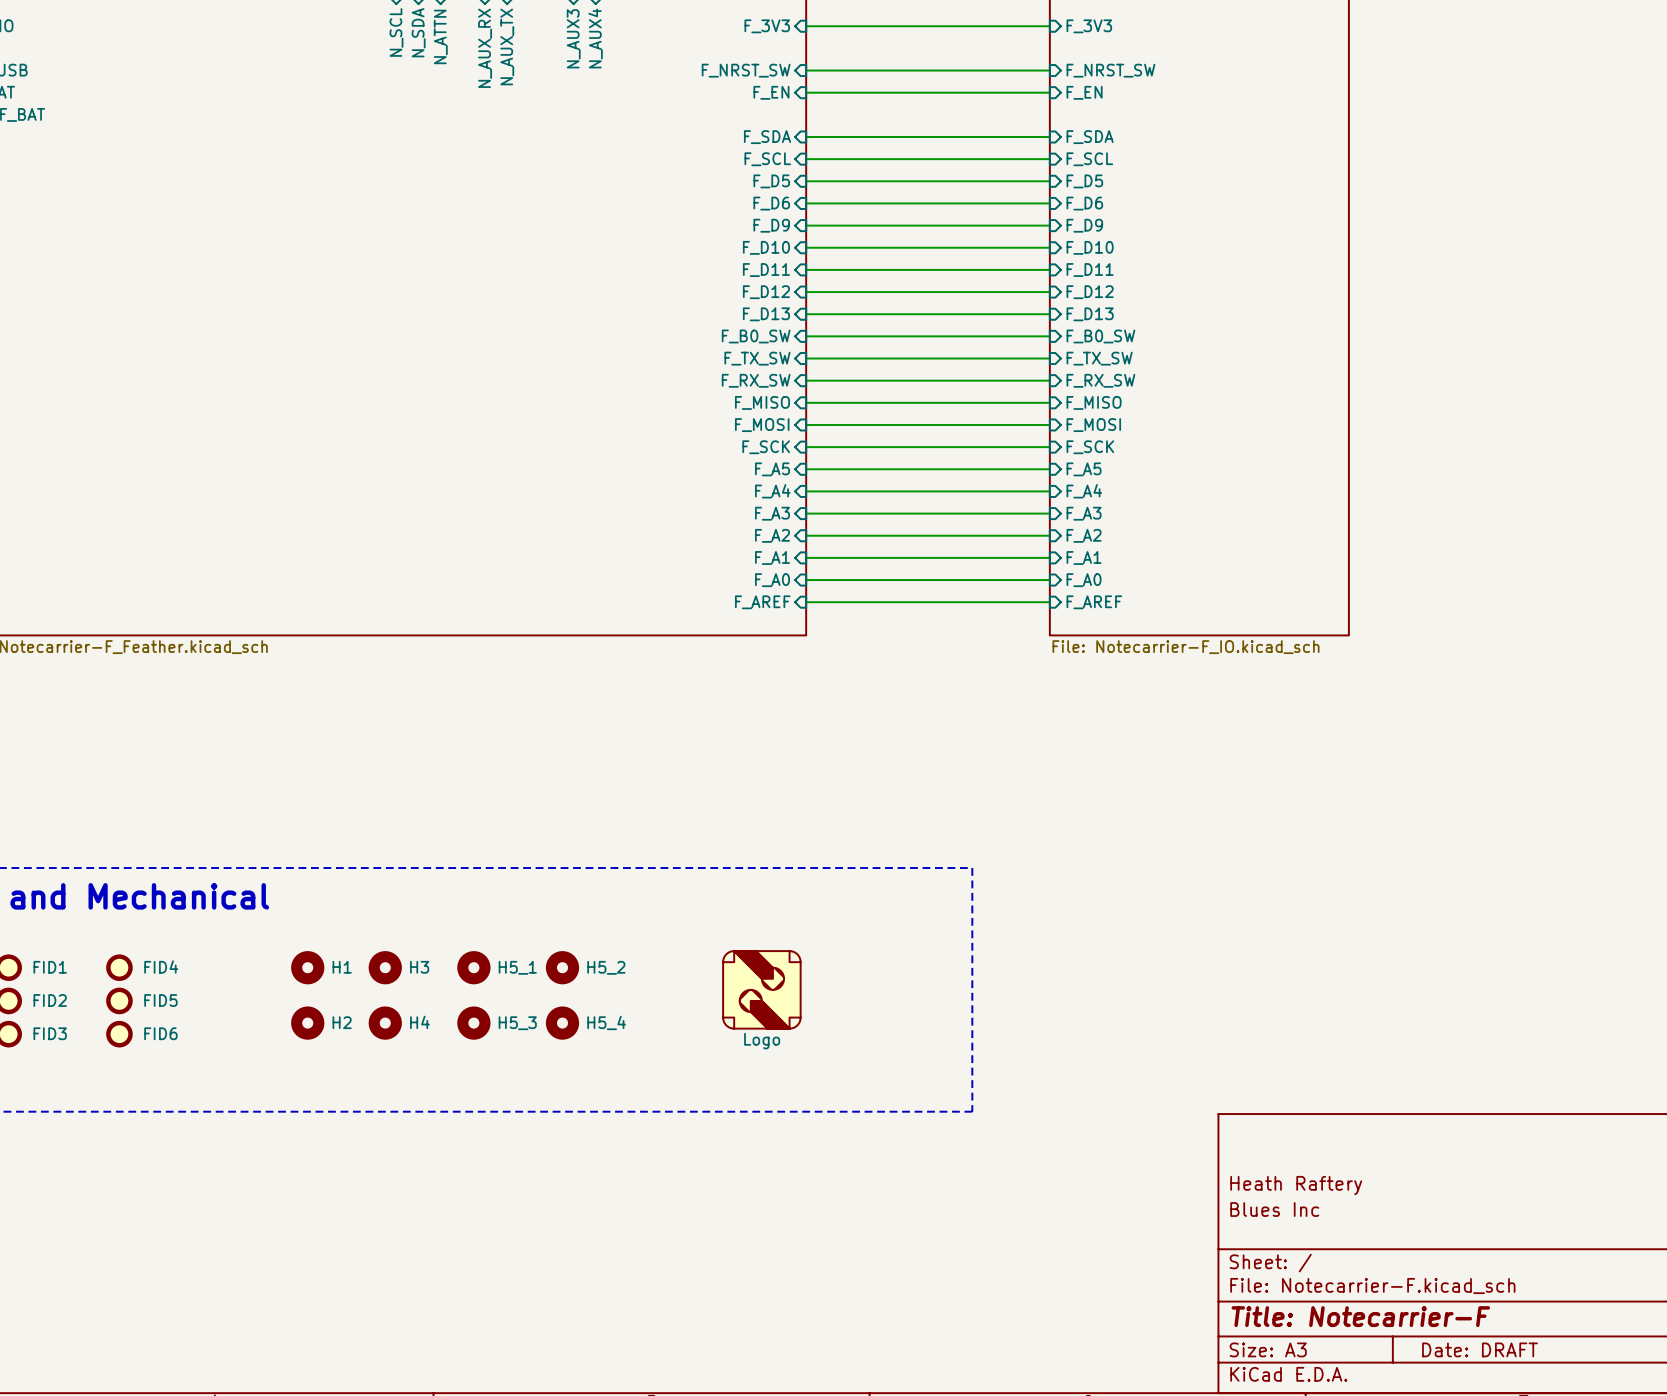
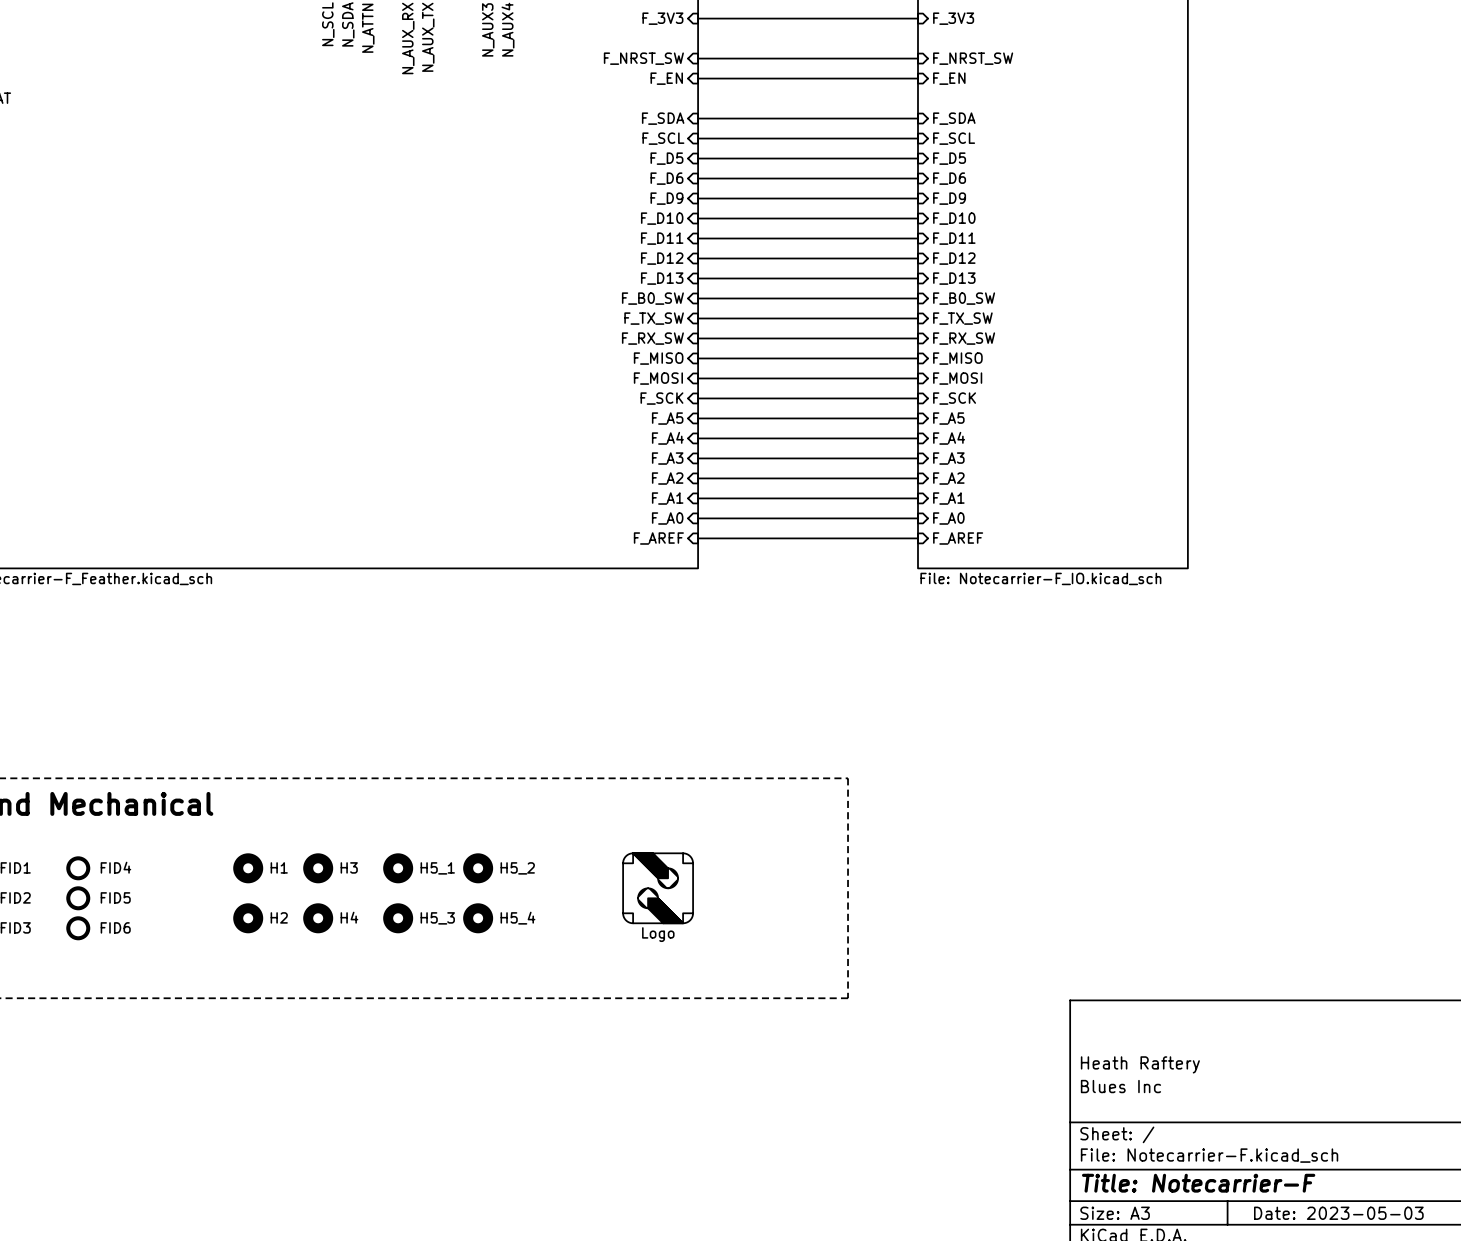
title block: Date: DRAFT (1480, 1349) -> Date: 2023-05-03 (1338, 1213)

